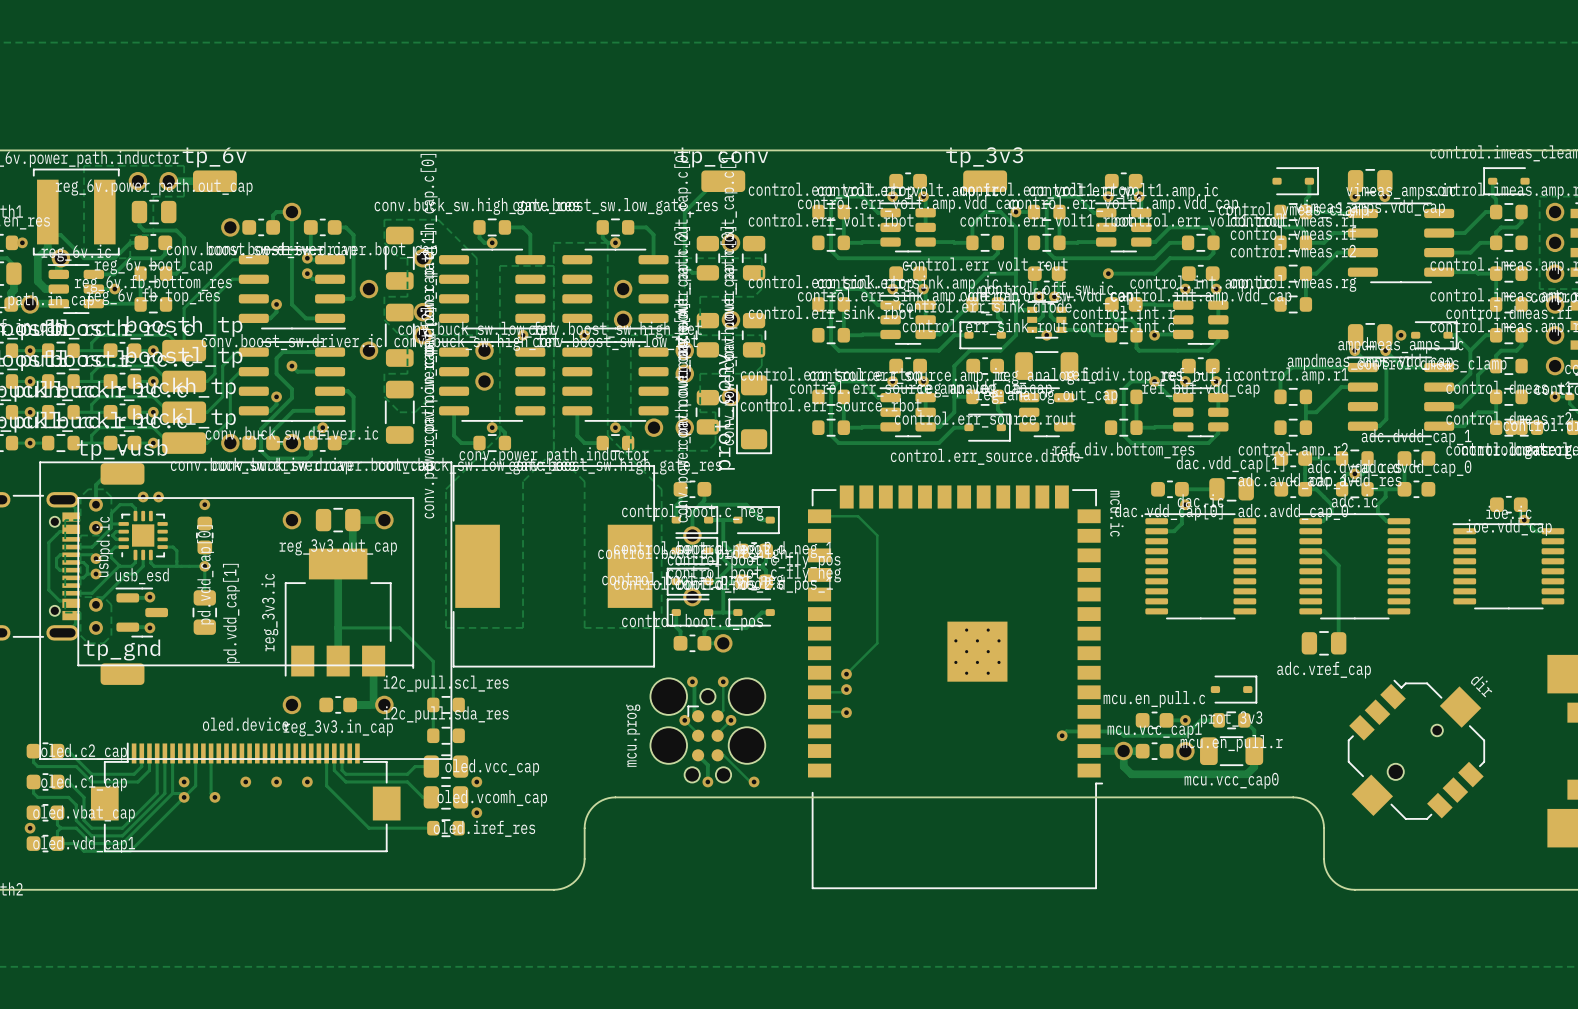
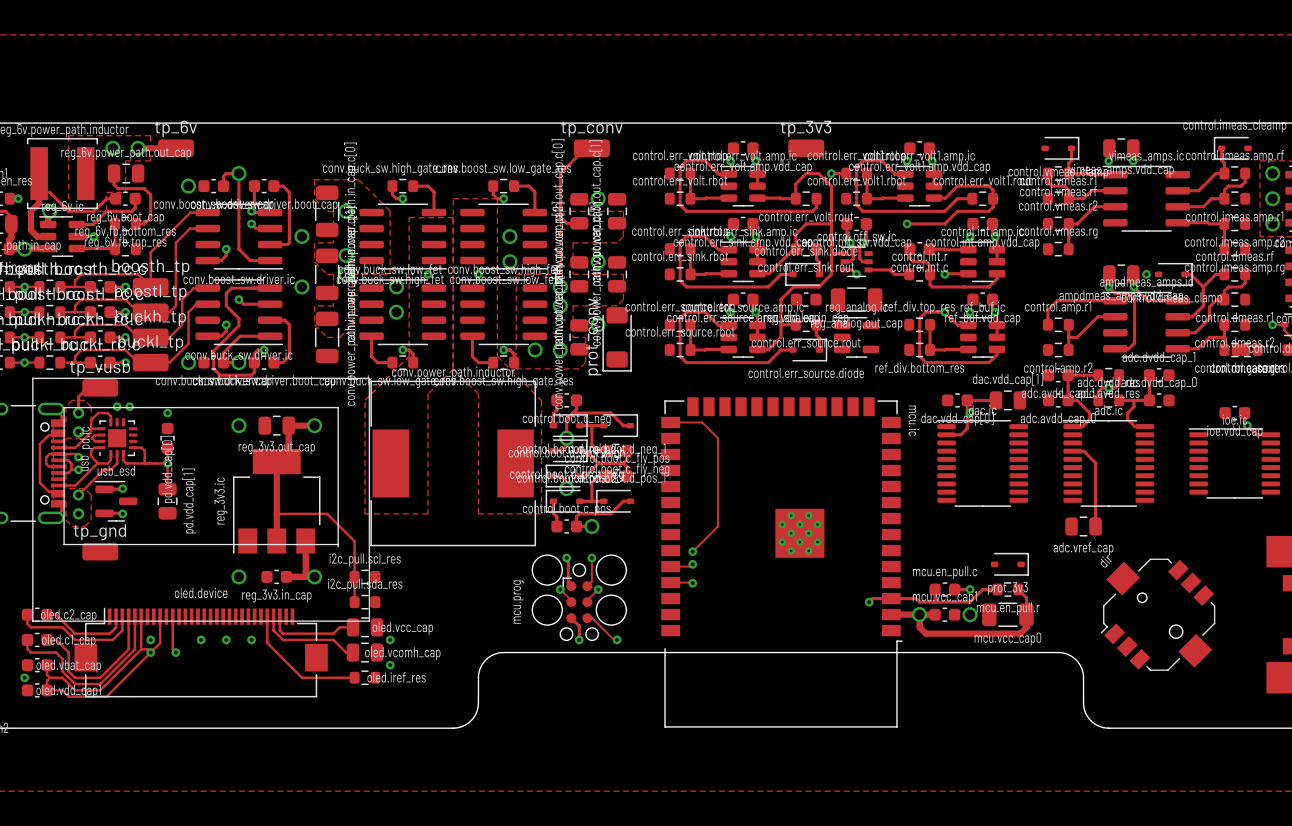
via: (1555, 304) -> none
via: (1555, 335) -> none
via: (1555, 366) -> none
dir rotation: 0° (1416, 749) -> 90° counterclockwise (1158, 614)

